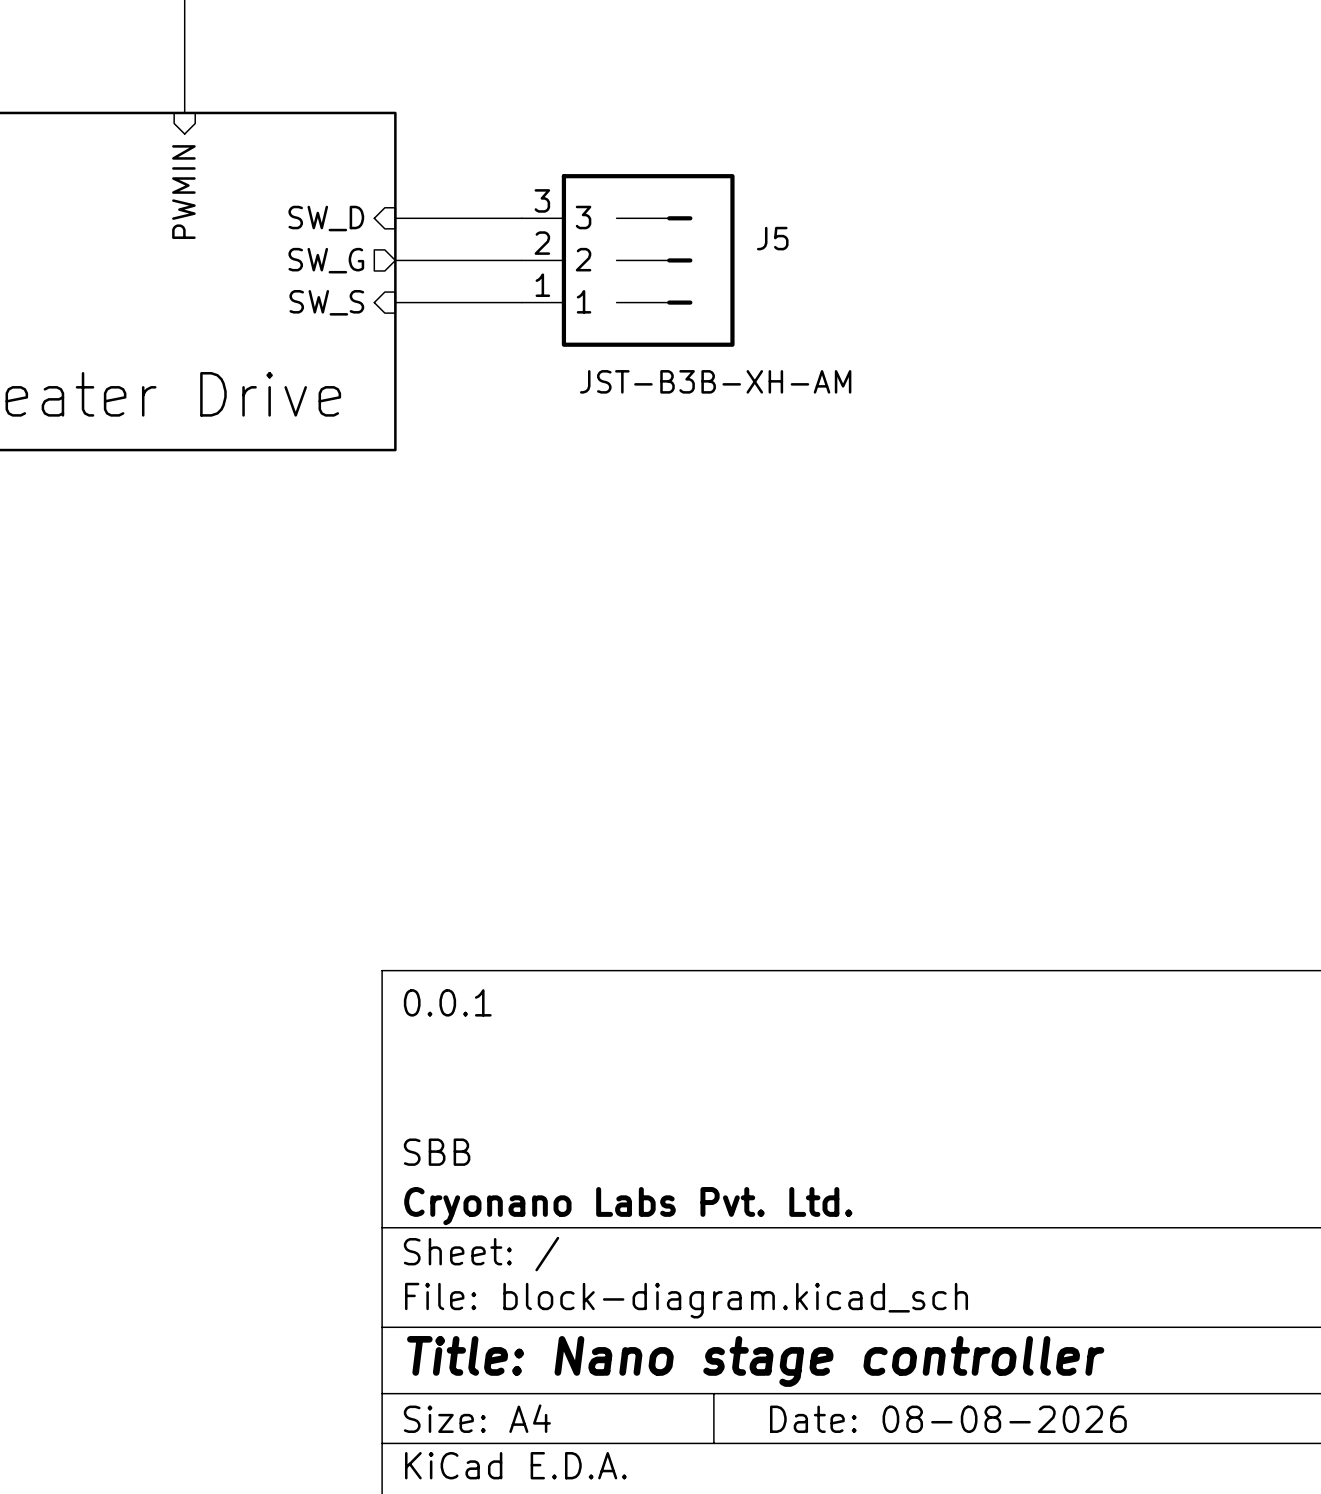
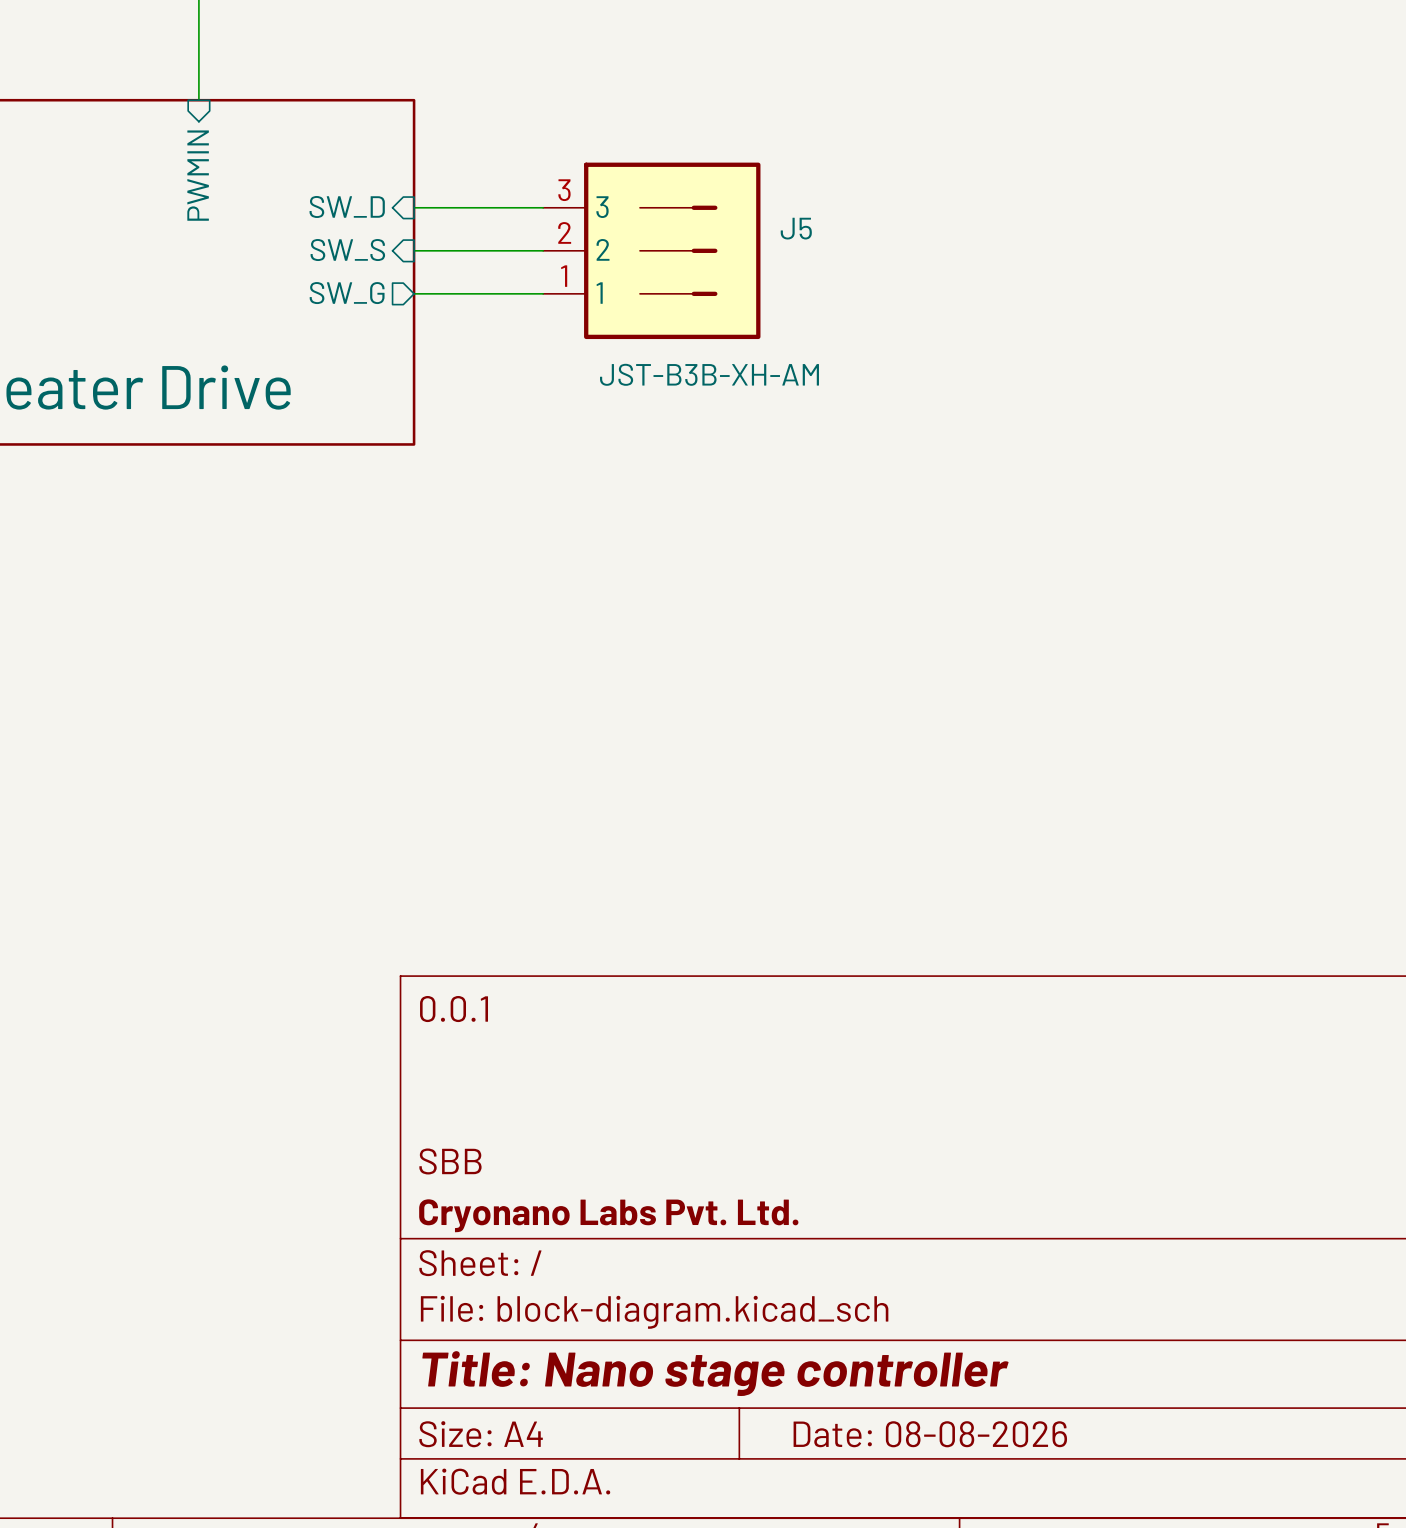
sheet pin shape: output (326, 260) -> input (347, 250)
sheet pin: SW_G (326, 260) -> SW_S (347, 250)
sheet pin shape: input (326, 302) -> output (347, 293)
sheet pin: SW_S (326, 302) -> SW_G (347, 293)

